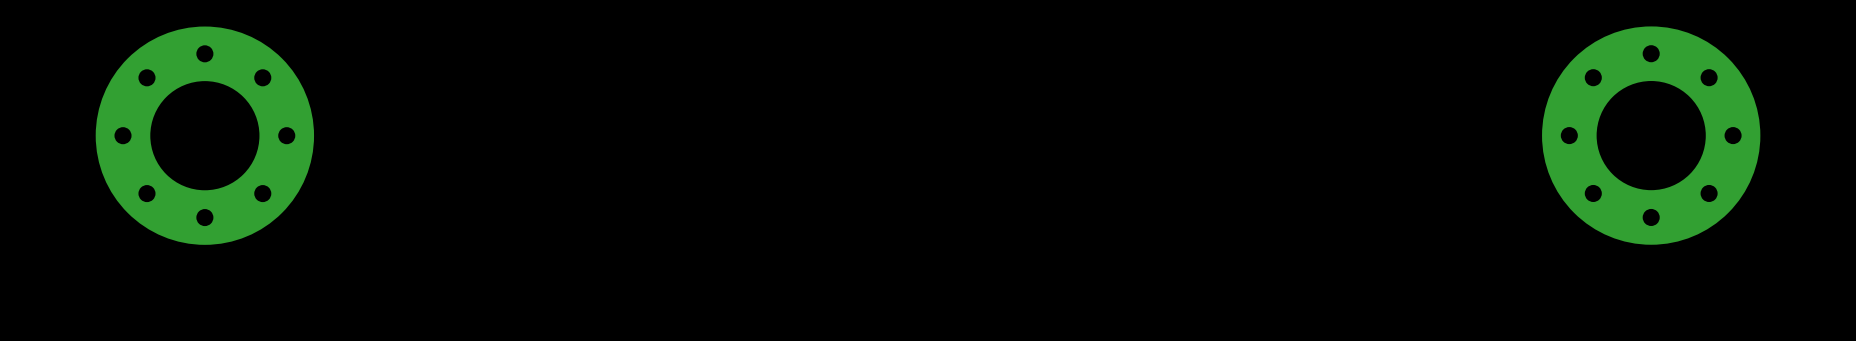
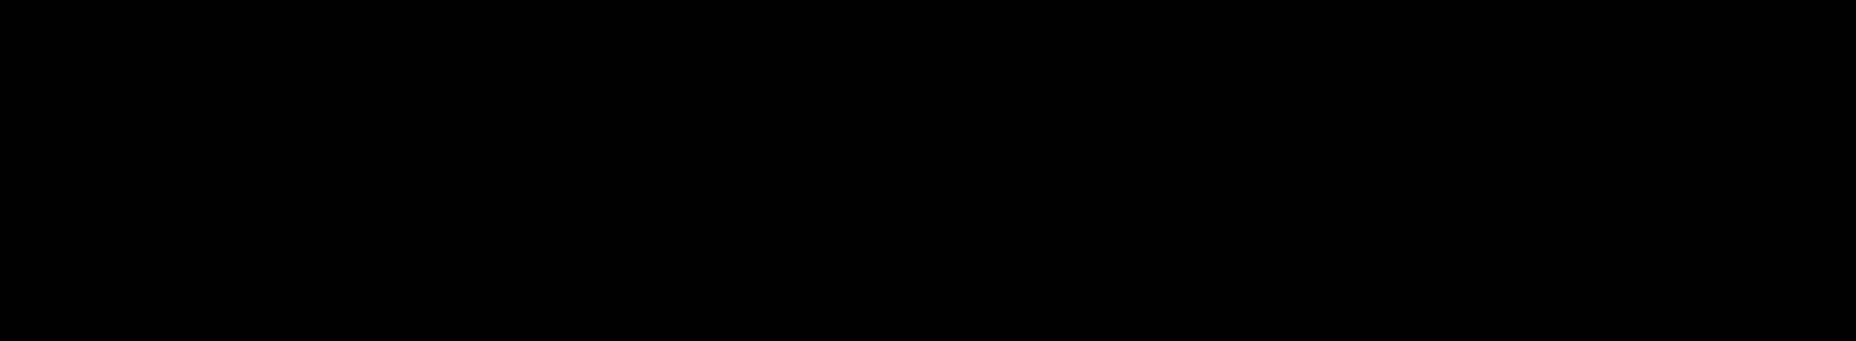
part: (204, 135) -> none
part: (1651, 135) -> none

